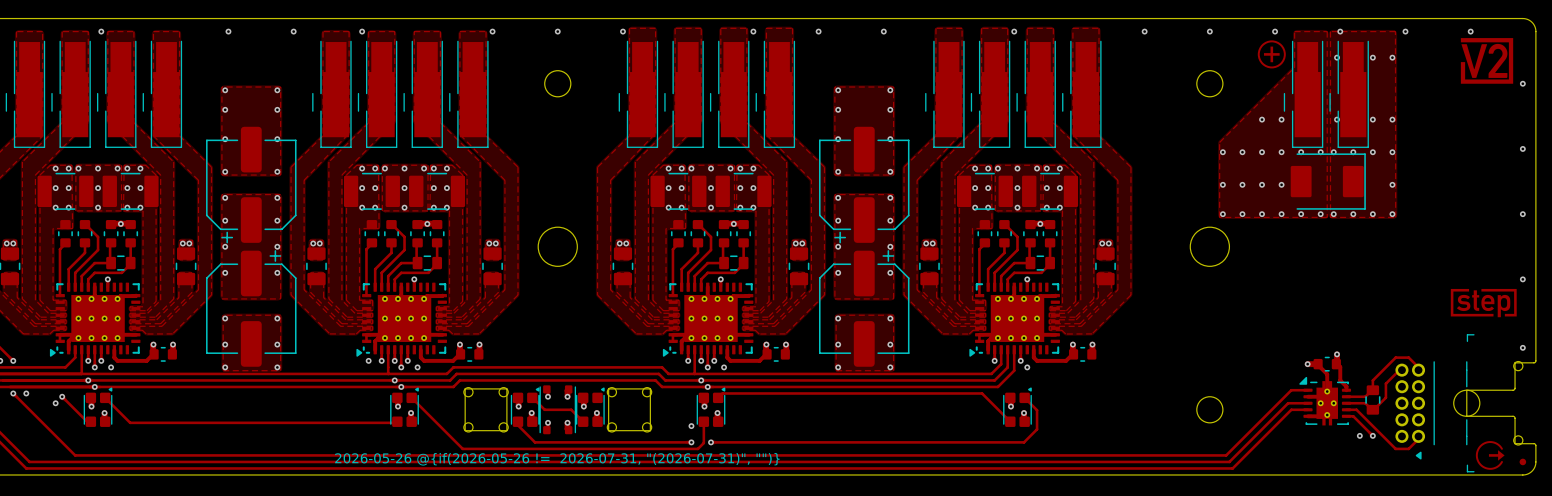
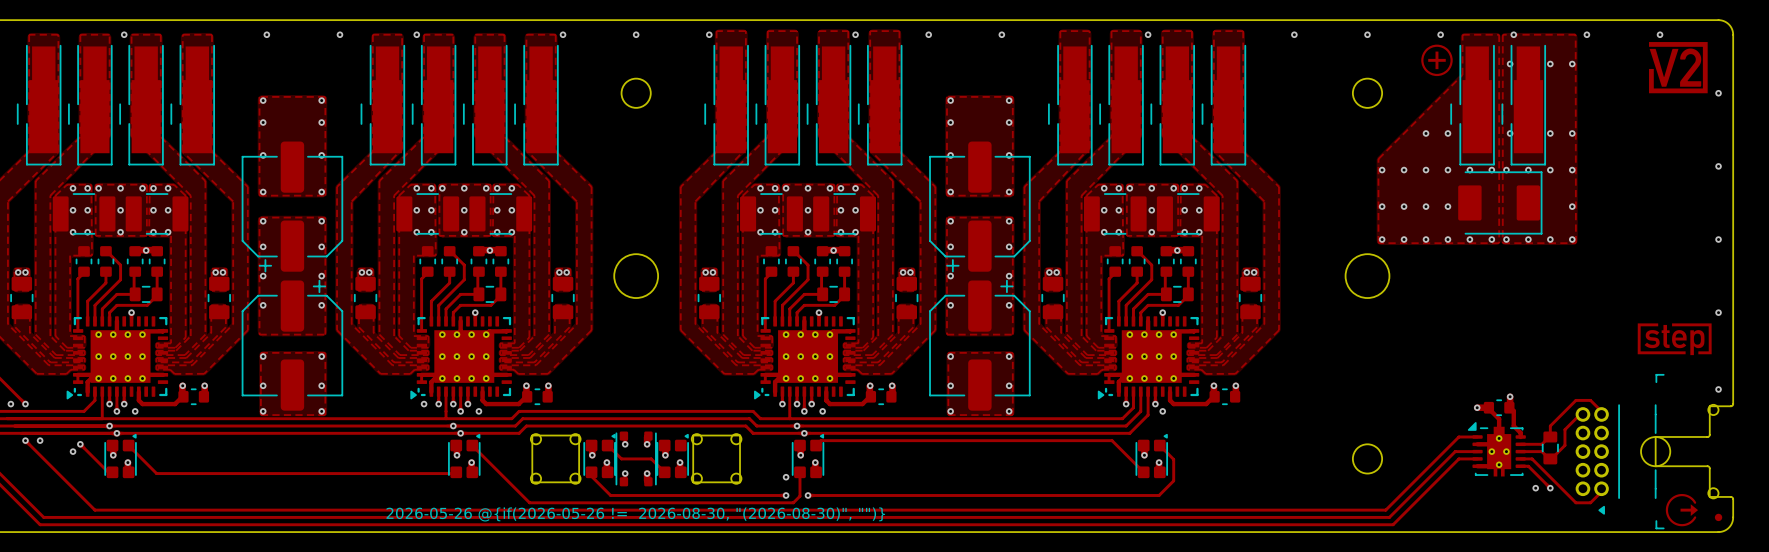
drawing shape: [335, 453, 780, 466] -> [386, 507, 886, 522]

